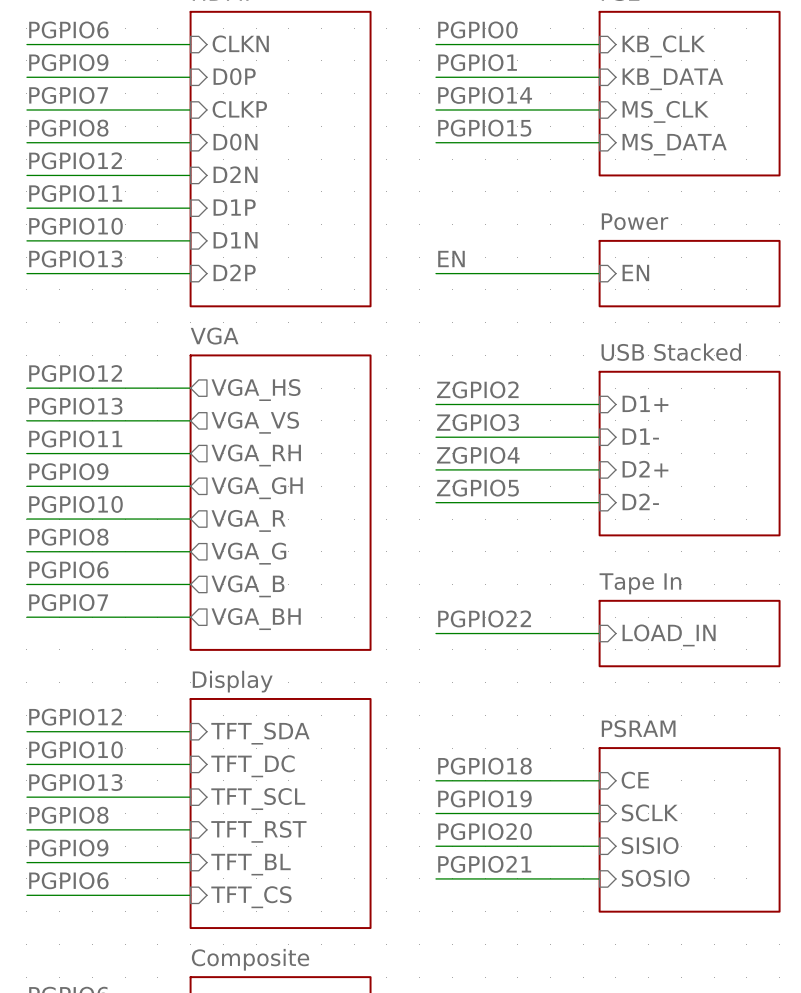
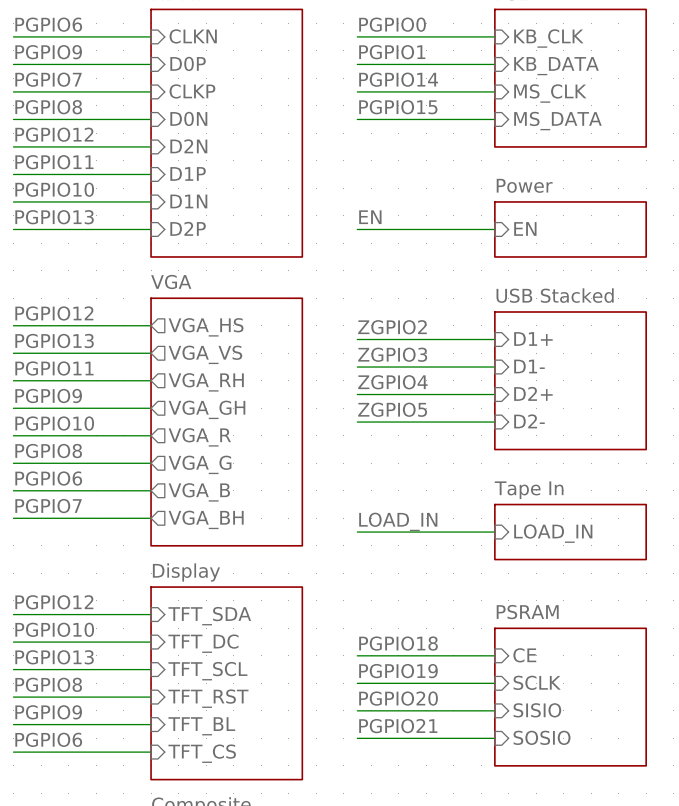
label: PGPIO22 (484, 618) -> LOAD_IN (398, 521)

